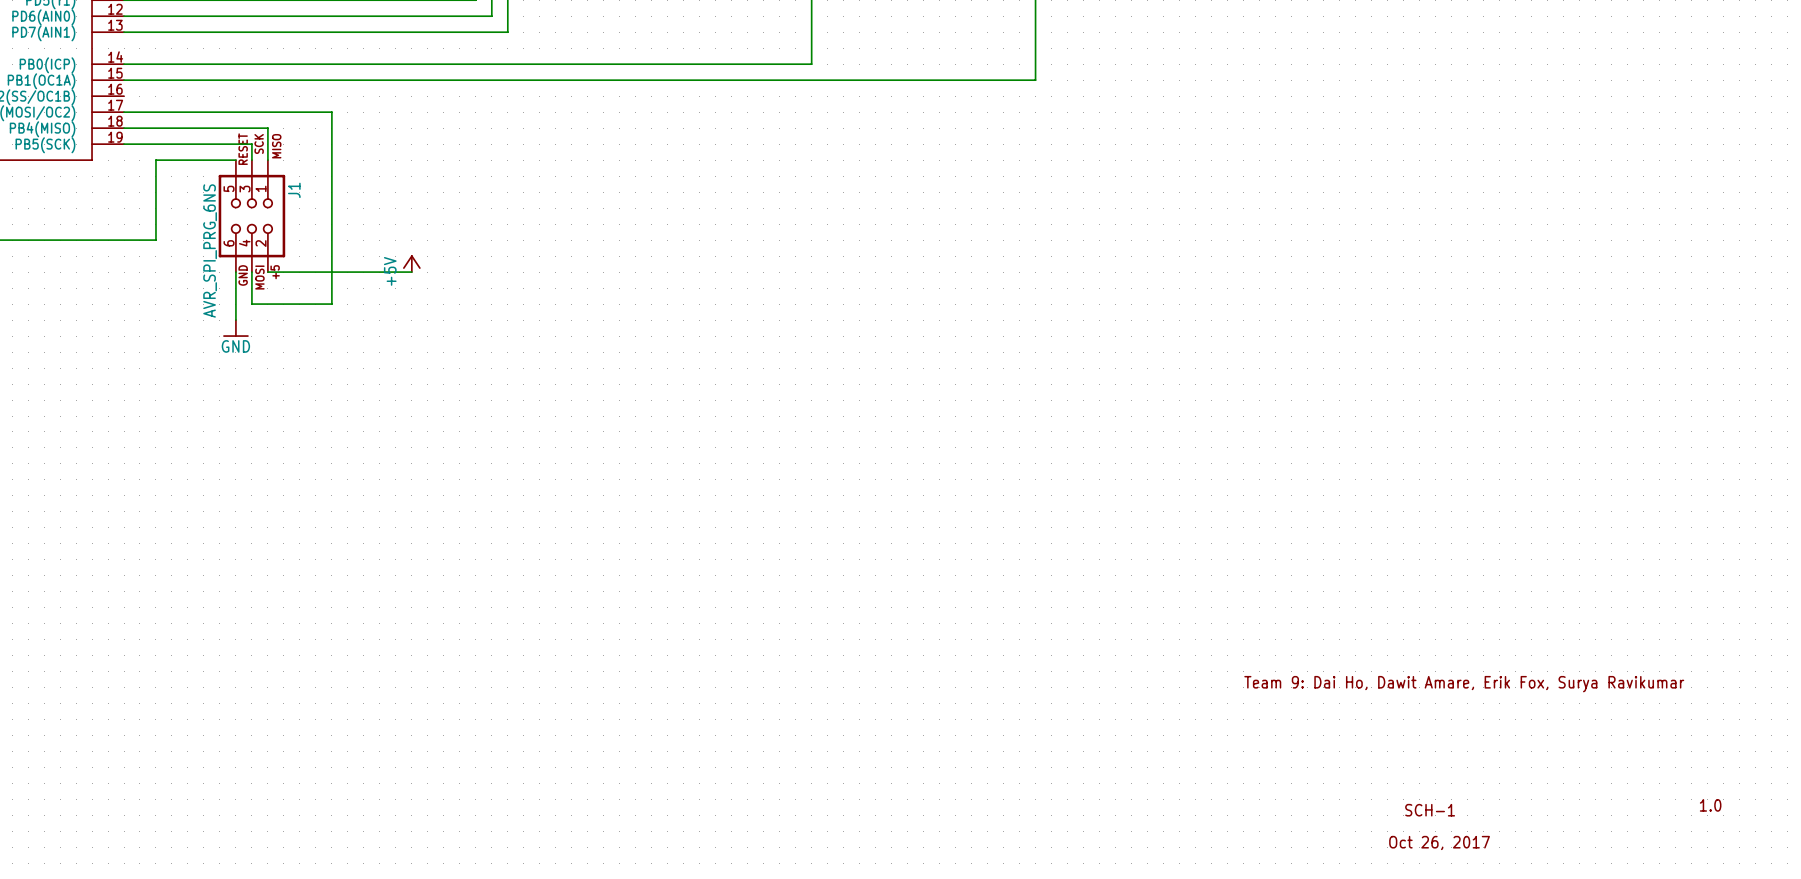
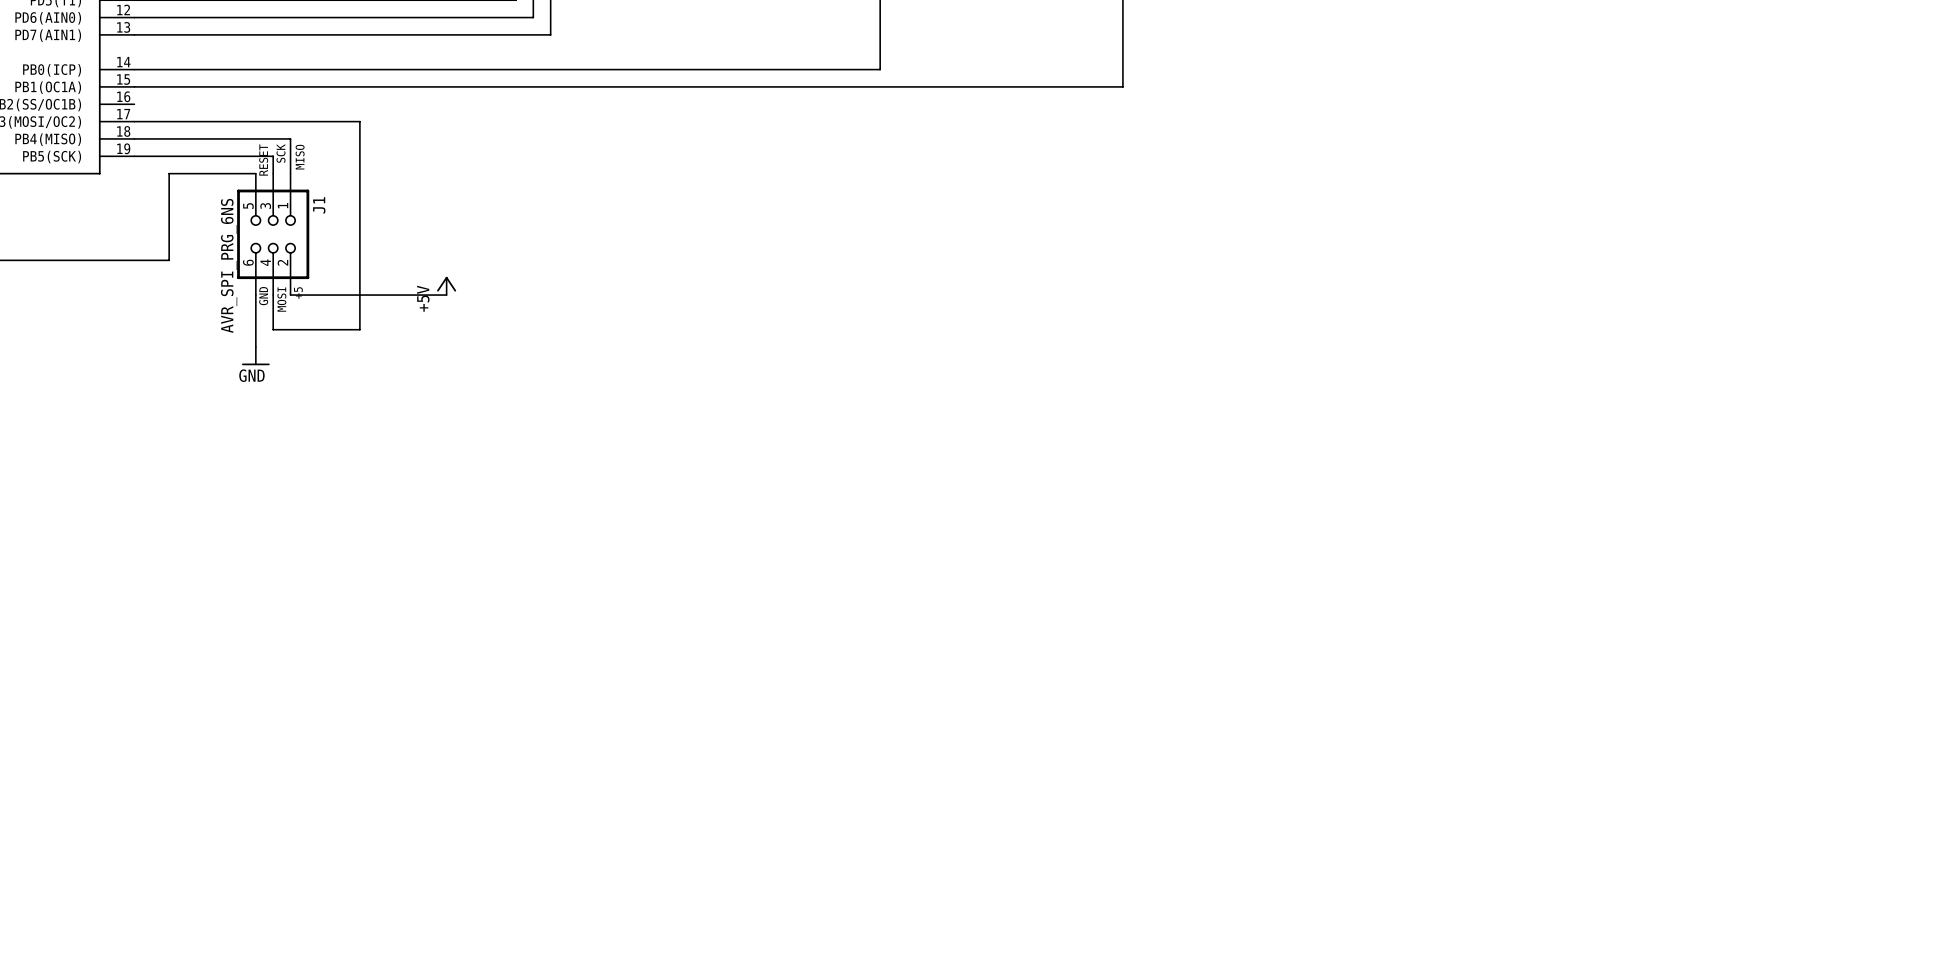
text: Team 9: Dai Ho, Dawit Amare, Erik Fox, Surya Ravikumar (1464, 684) -> none
text: 1.0 (1710, 805) -> none
text: SCH-1 (1430, 810) -> none
text: Oct 26, 2017 (1439, 842) -> none

